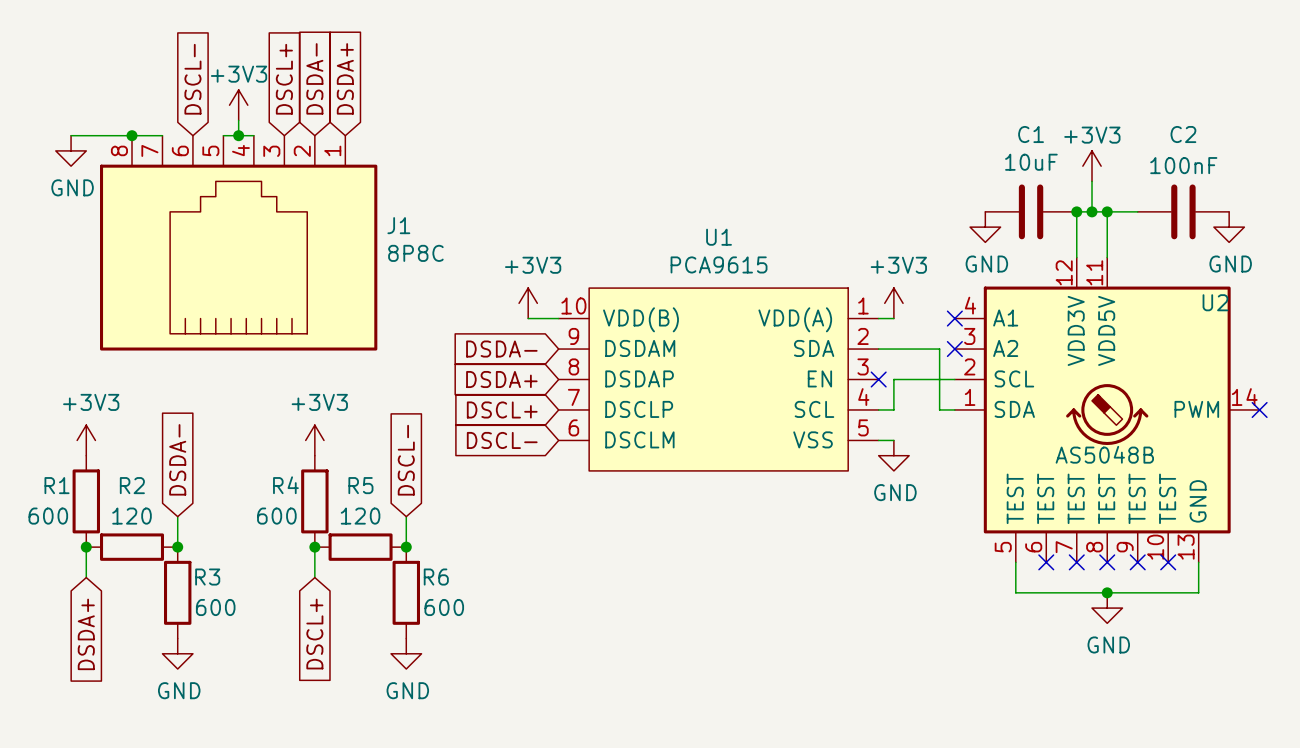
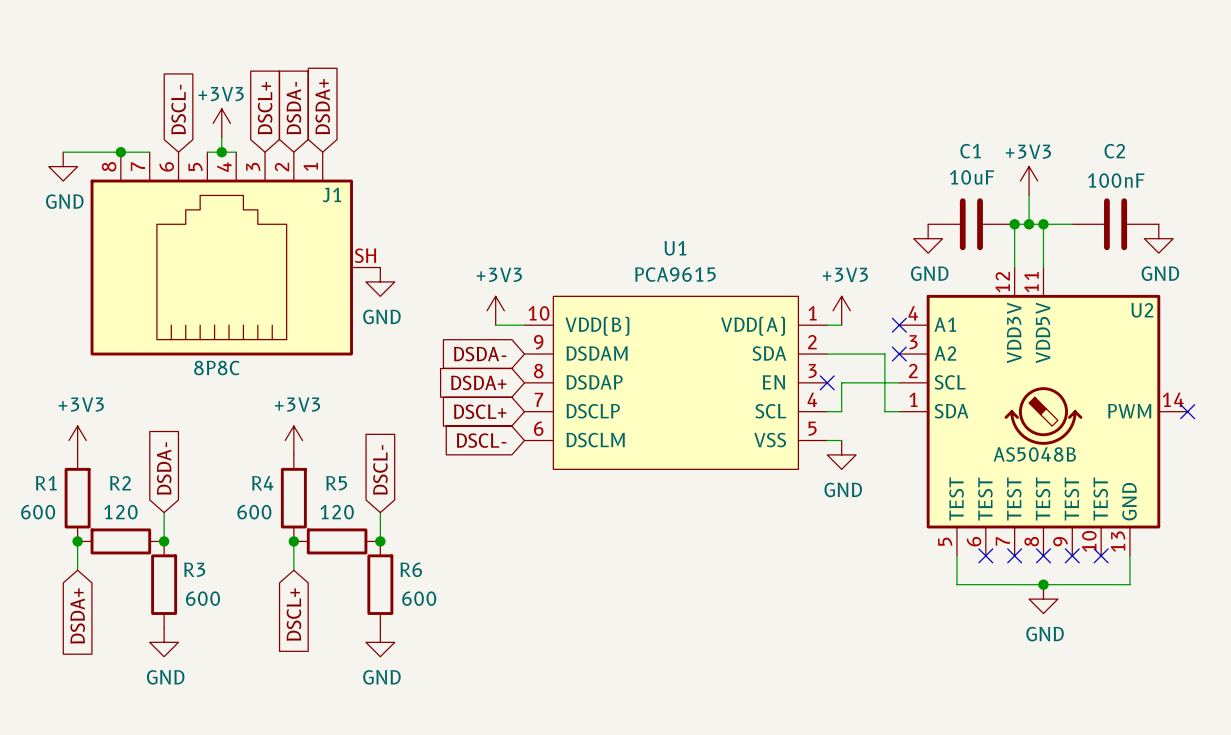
J1 symbol: [100, 135, 378, 351] -> [90, 152, 381, 356]
J1 name position: J1 (398, 225) -> J1 (331, 194)
J1 value position: 8P8C (415, 253) -> 8P8C (216, 367)
power symbol: none -> GND (380, 281)

